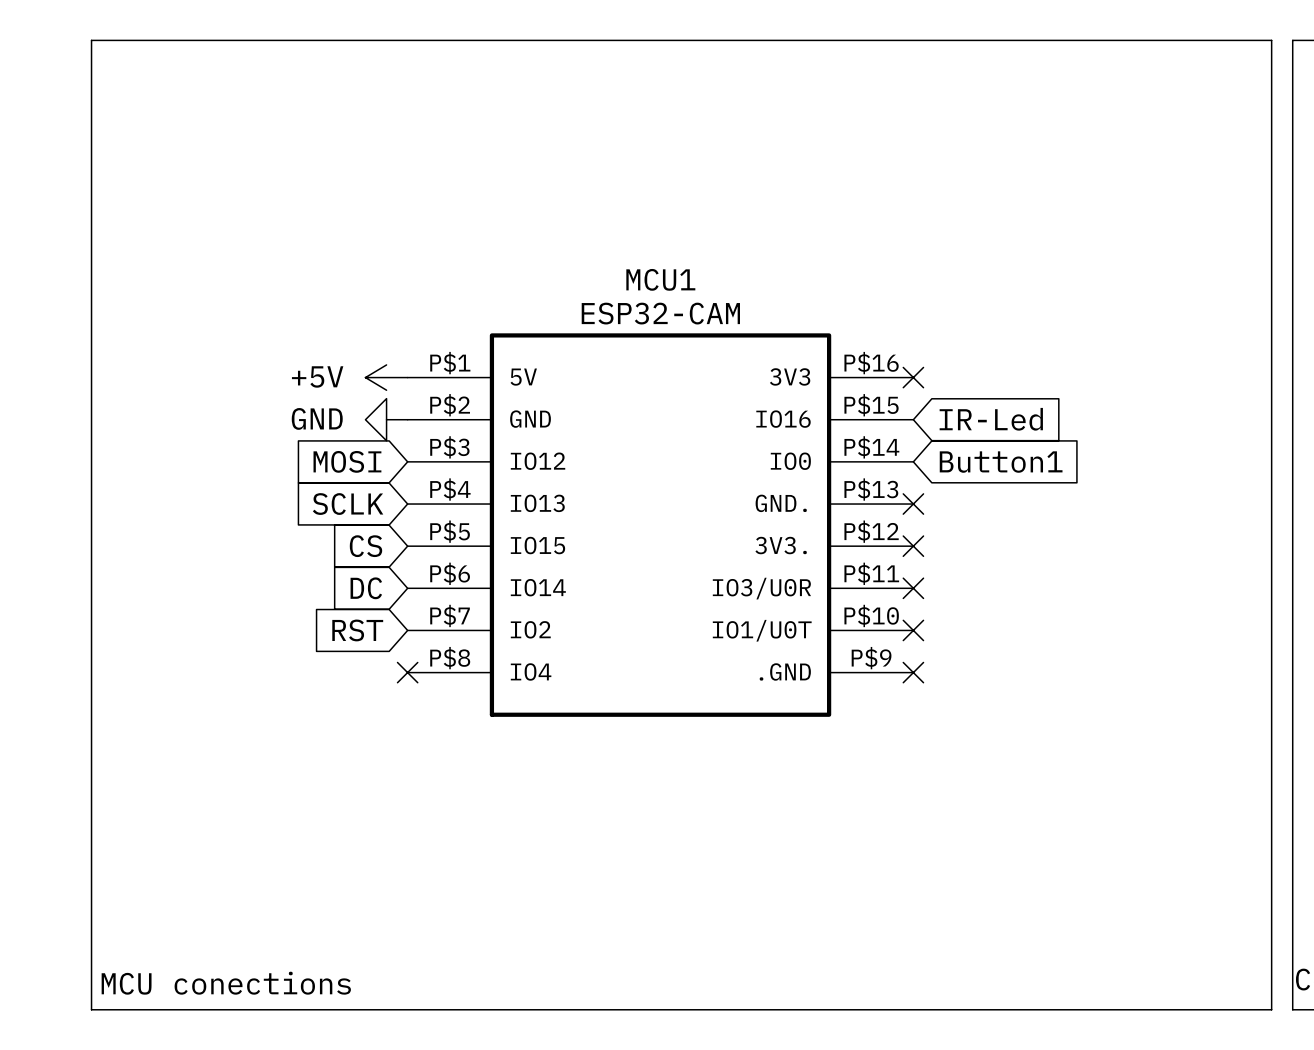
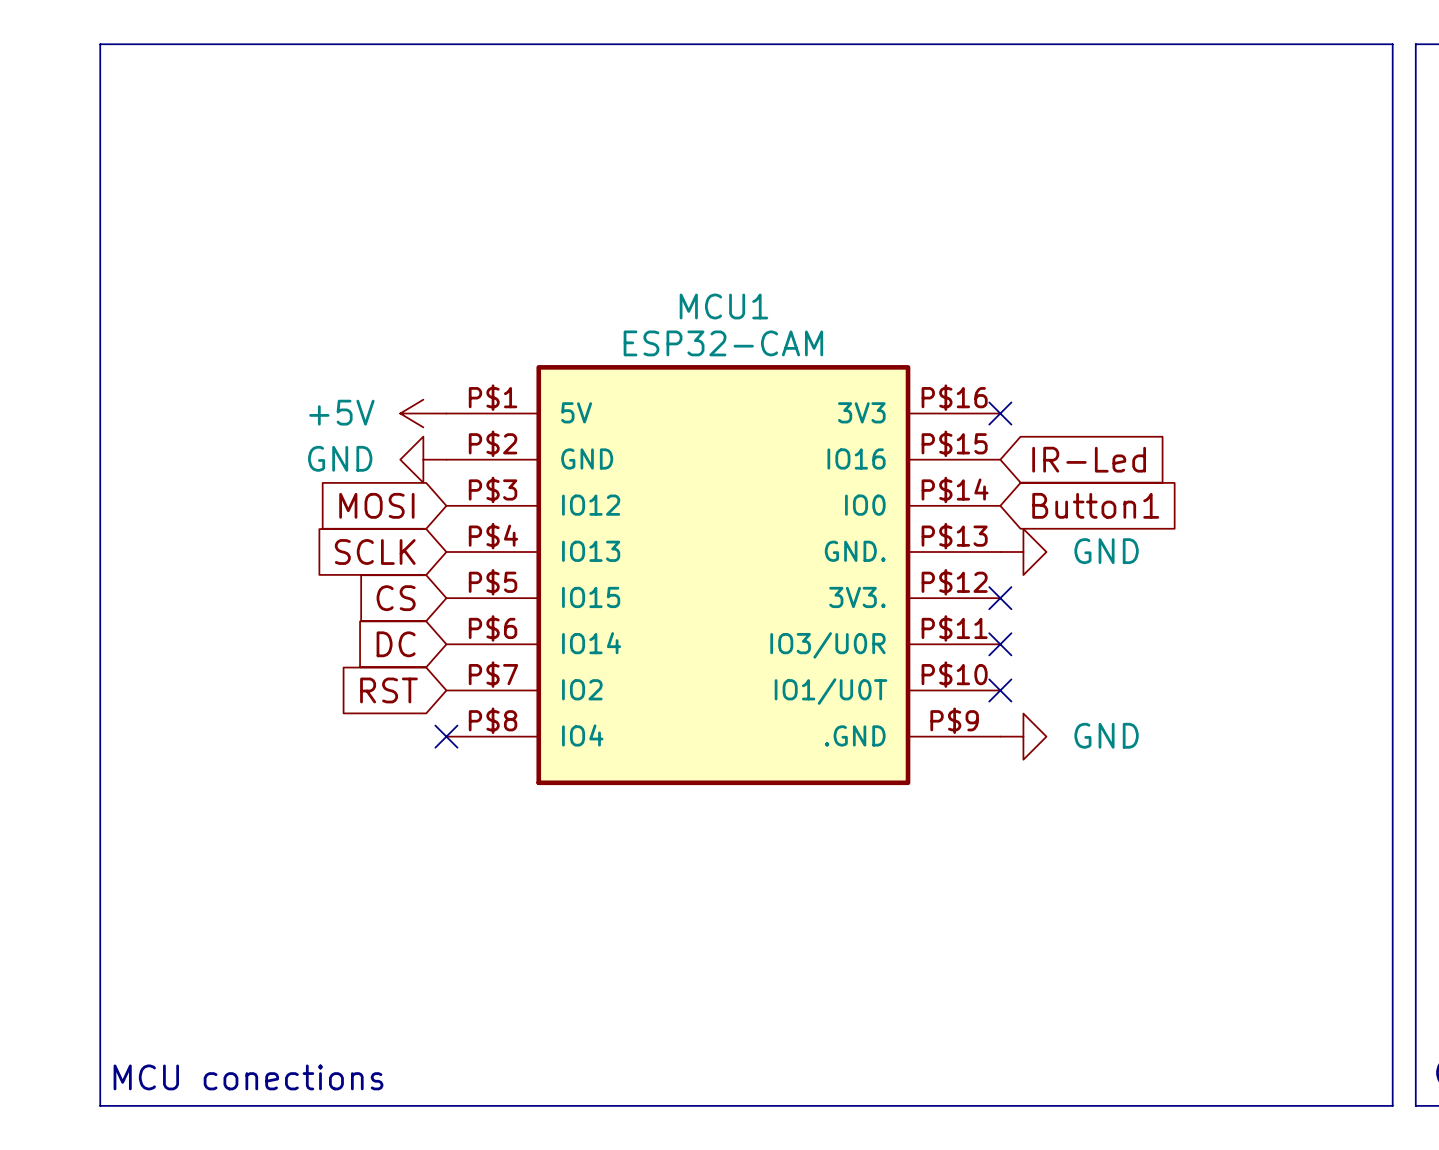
no-connect mark: (913, 504) -> none
power symbol: none -> GND (1023, 551)
no-connect mark: (913, 672) -> none
power symbol: none -> GND (1023, 736)

